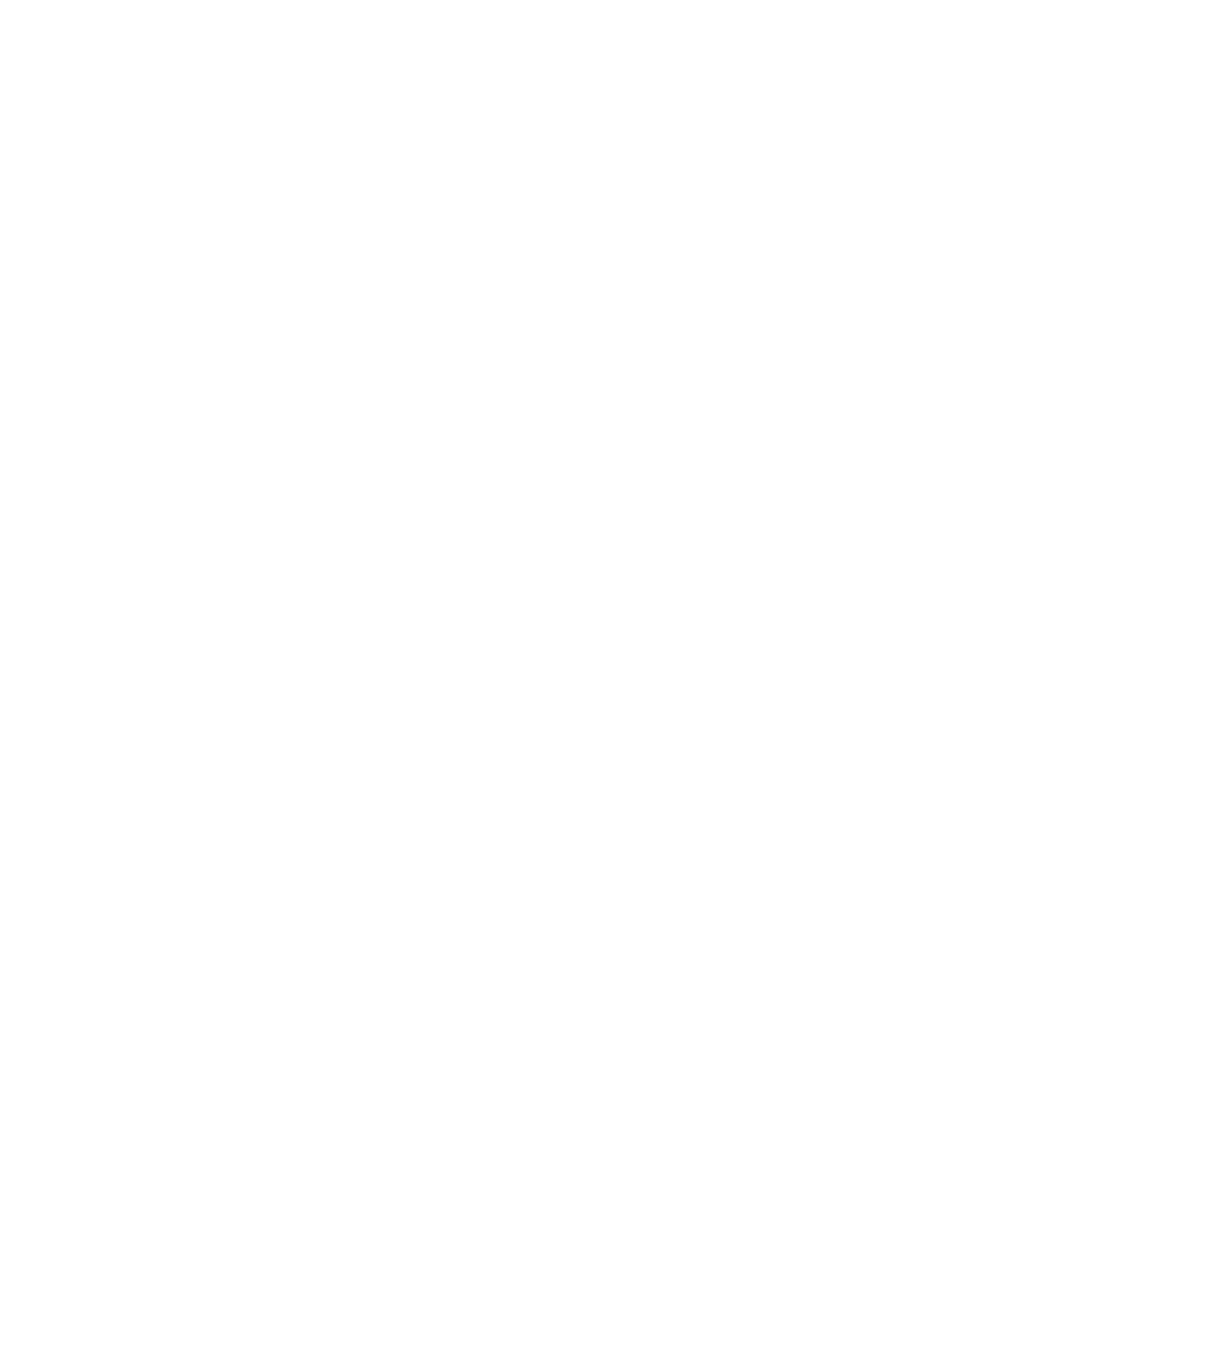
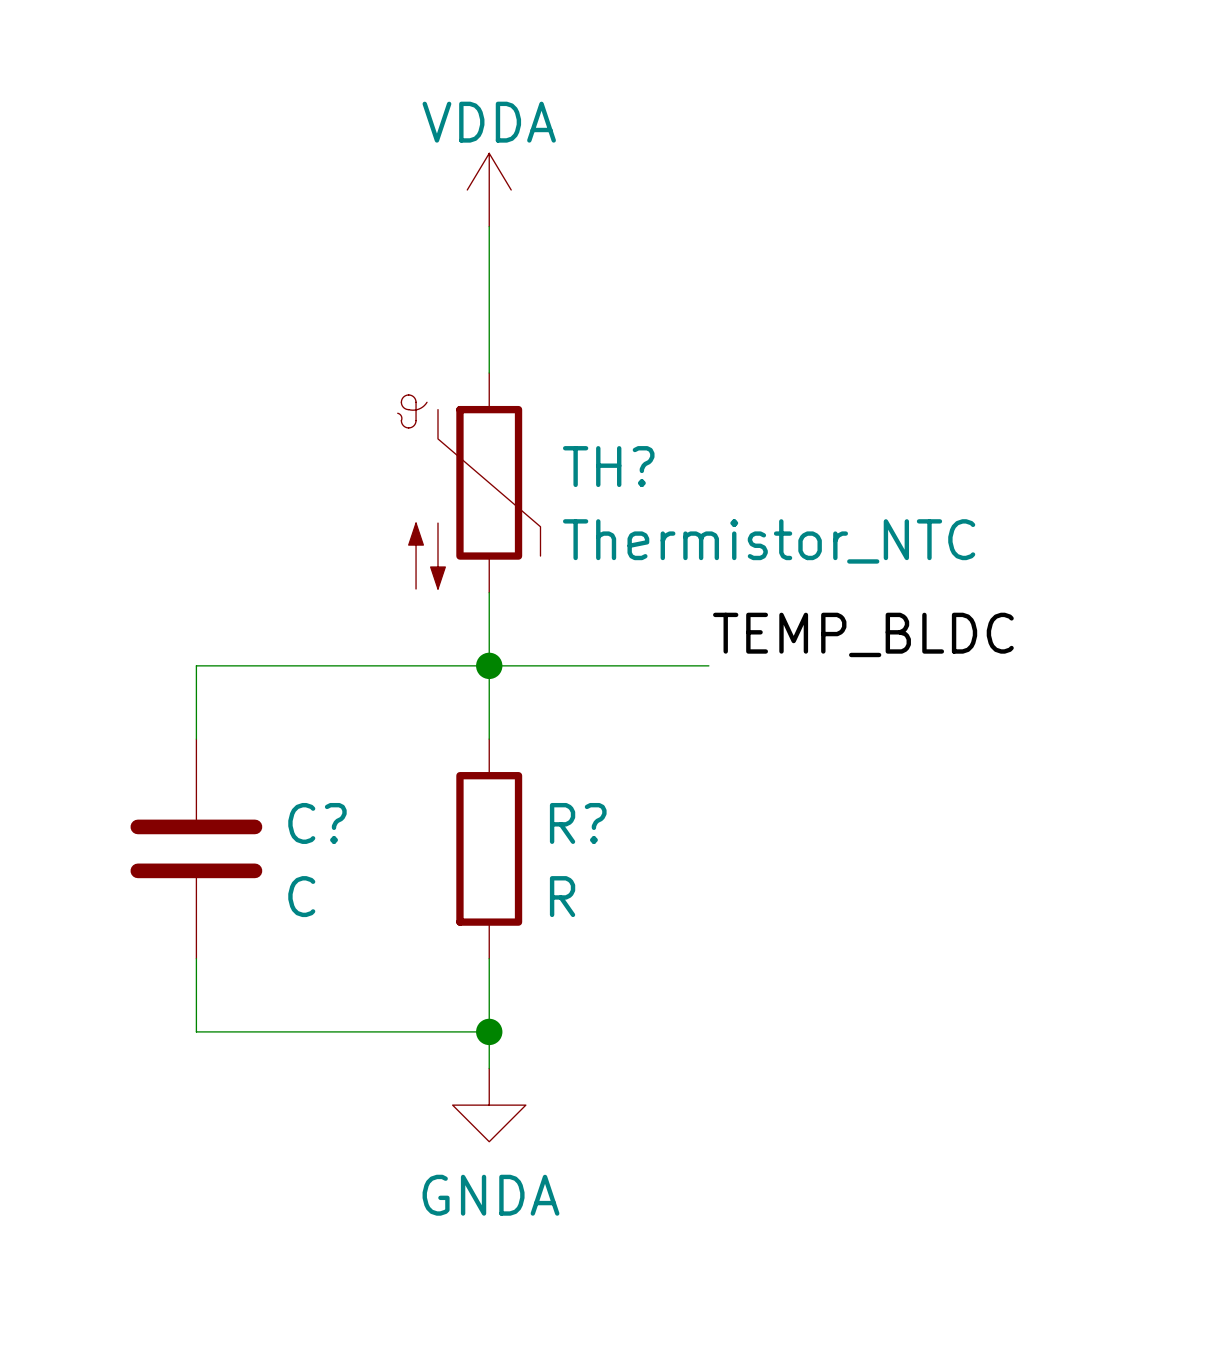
power symbol: none -> VDDA (489, 189)
wire: none -> (489, 226) (489, 373)
TH?: none -> Thermistor_NTC (469, 482)
wire: none -> (489, 592) (489, 739)
label: none -> TEMP_BLDC (863, 634)
junction: none -> (489, 665)
wire: none -> (708, 665) (196, 665) (196, 739)
C?: none -> C (196, 848)
R?: none -> R (489, 848)
wire: none -> (196, 958) (196, 1031) (489, 1031)
wire: none -> (489, 958) (489, 1068)
junction: none -> (489, 1031)
power symbol: none -> GNDA (489, 1105)

